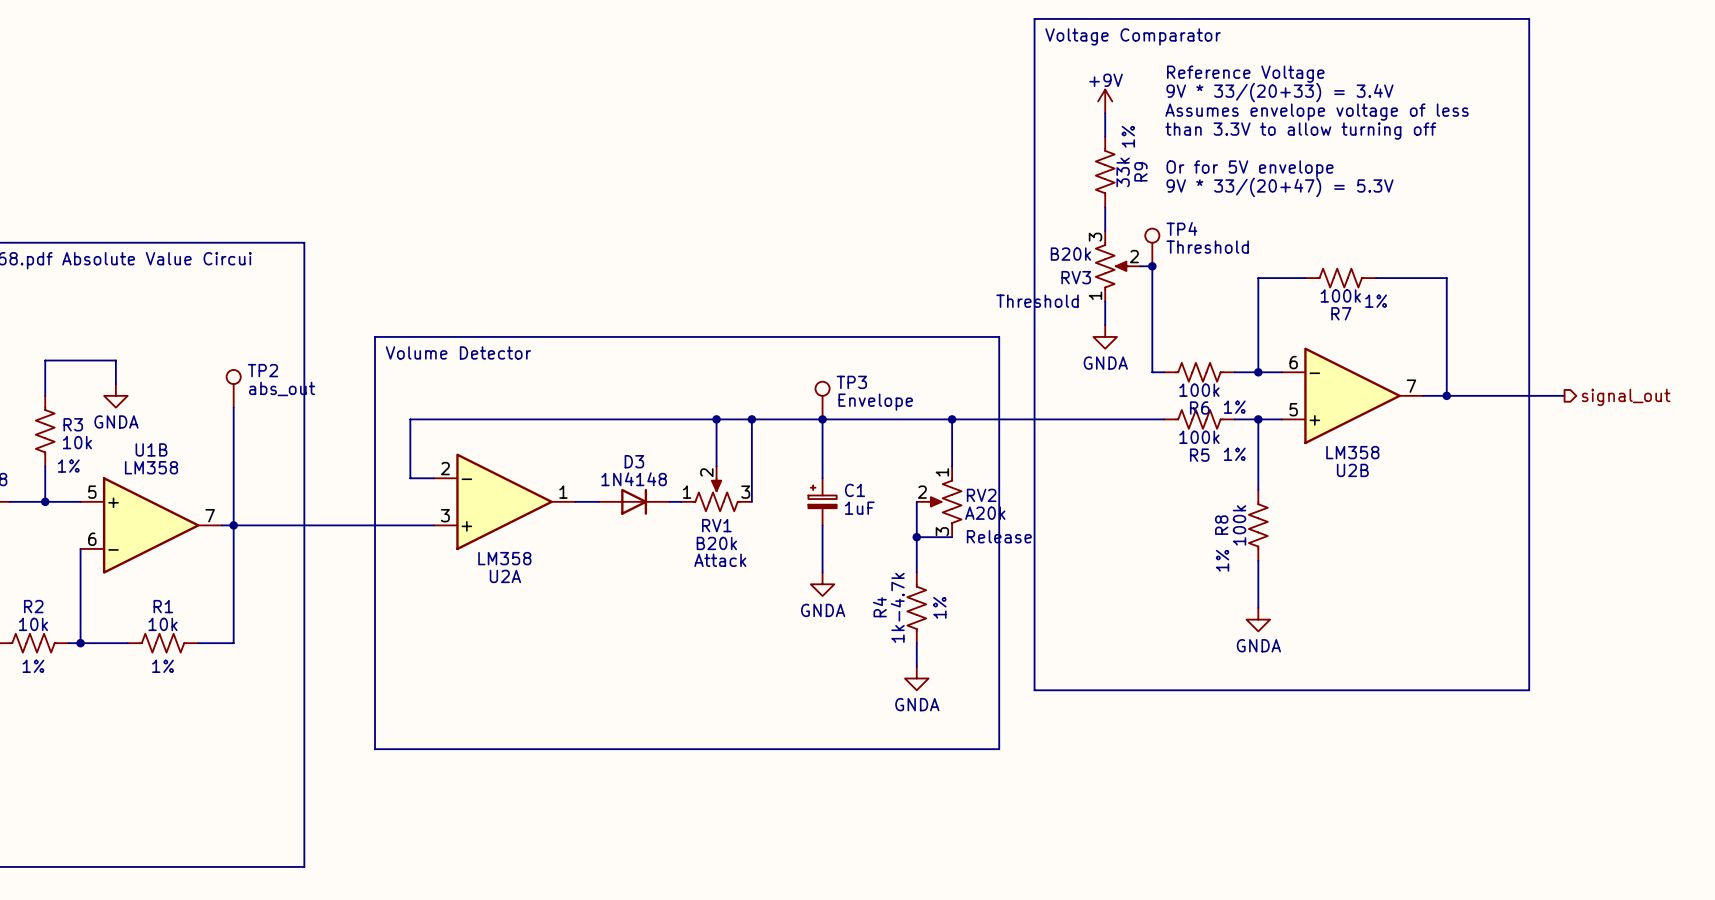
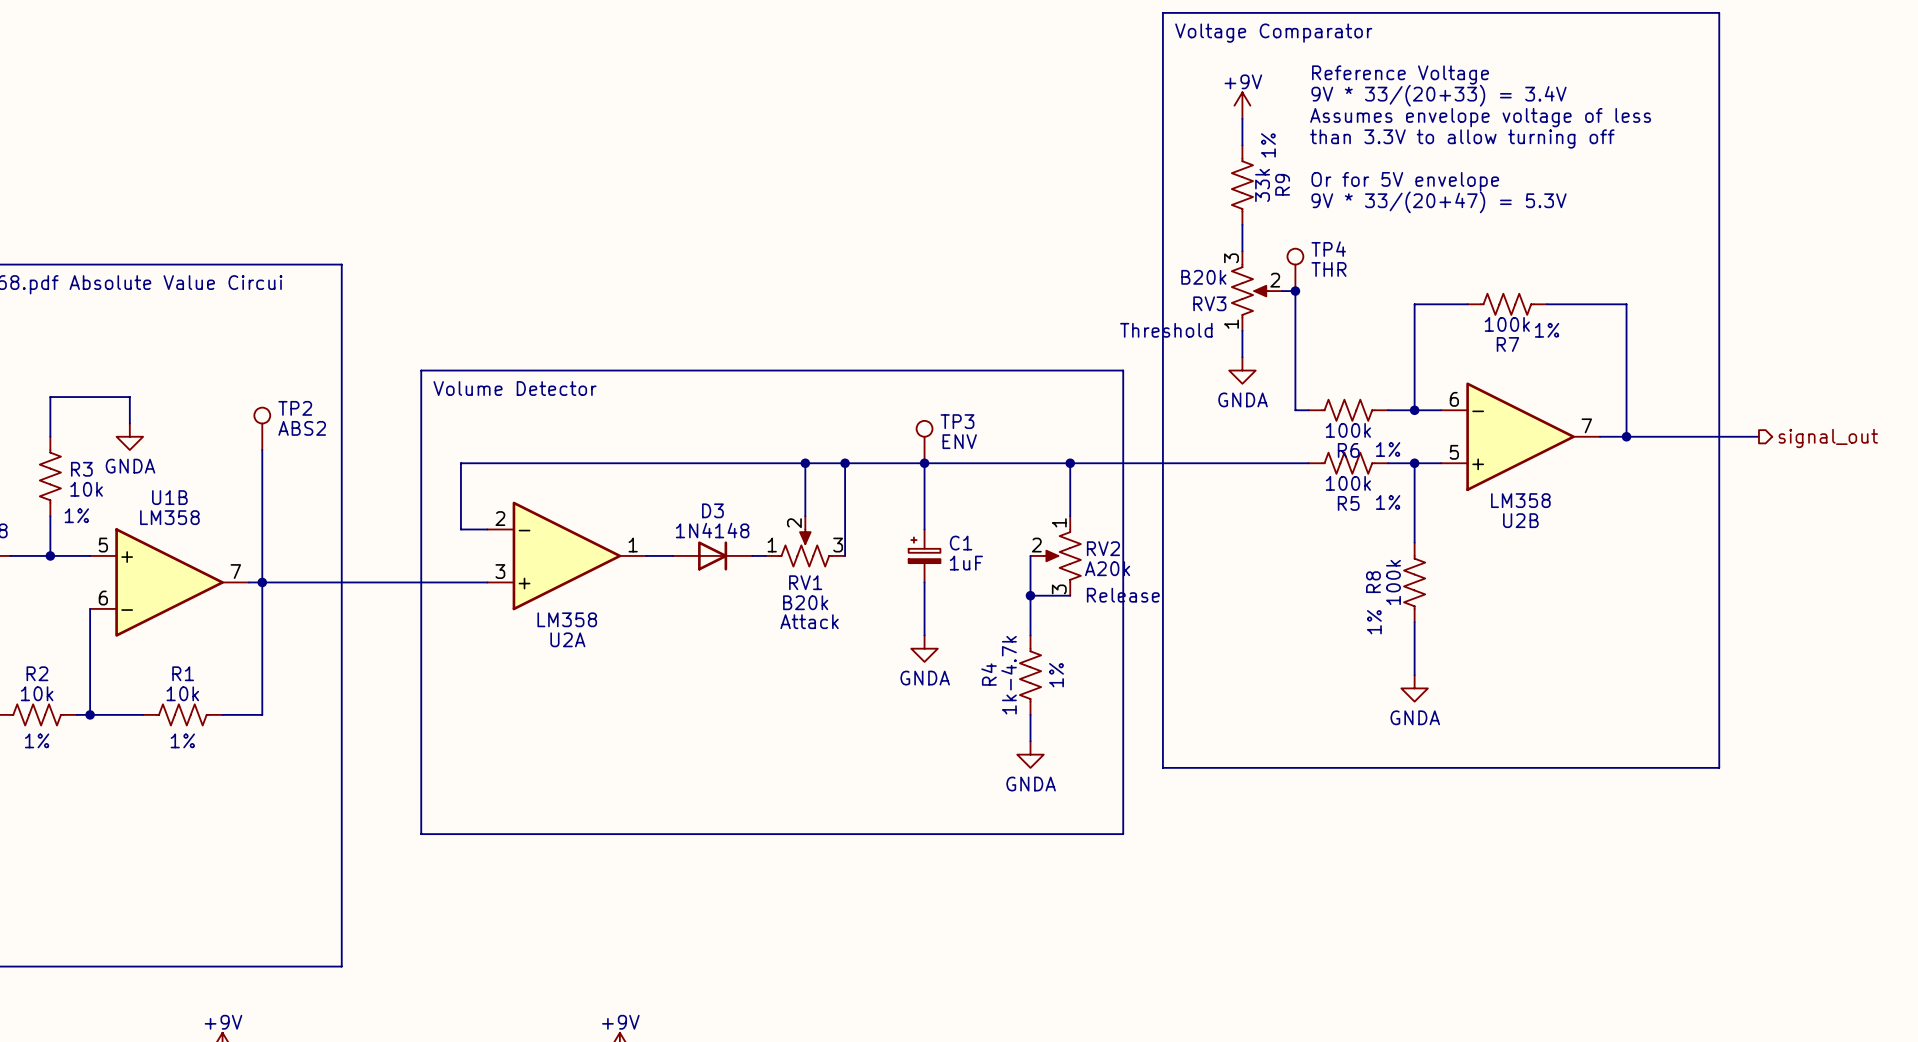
TP4 value: Threshold (1207, 247) -> THR (1329, 269)
TP2 value: abs_out (282, 388) -> ABS2 (302, 428)
TP3 value: Envelope (875, 402) -> ENV (959, 441)

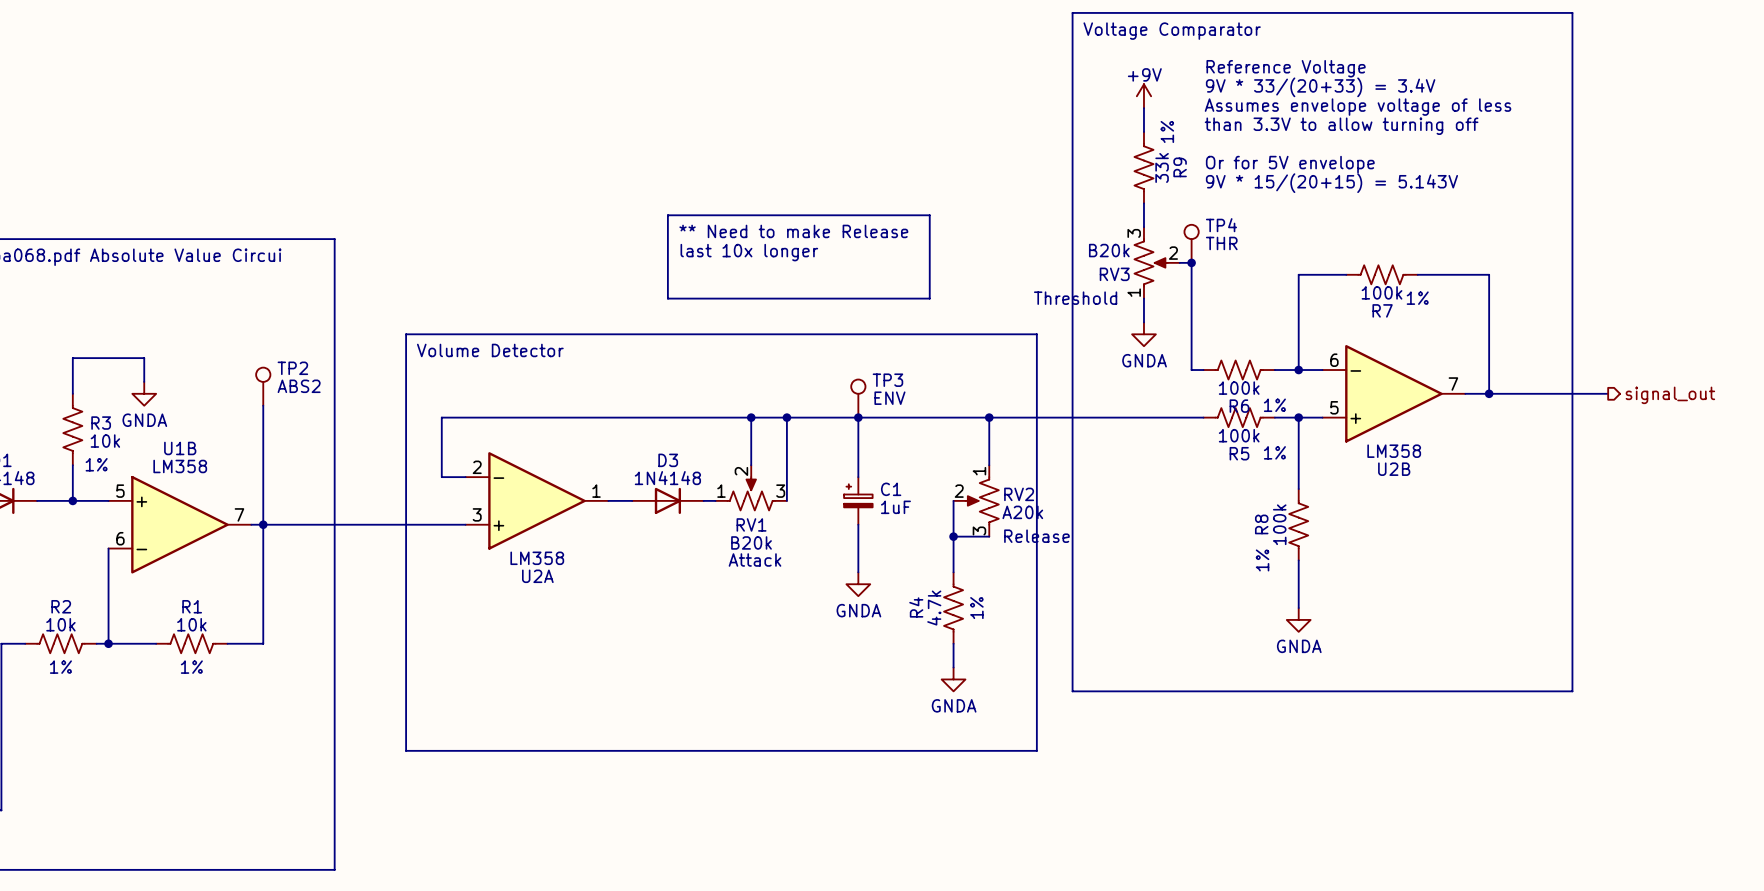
text: 9V * 33/(20+47) = 5.3V (1438, 202) -> 9V * 15/(20+15) = 5.143V (1331, 183)
line: none -> (667, 215) (929, 215) (929, 298) (667, 298) (667, 215)
text: none -> ** Need to make Release (793, 231)
text: none -> last 10x longer (749, 252)
R4 value: 1k-4.7k (1009, 675) -> 4.7k (934, 608)

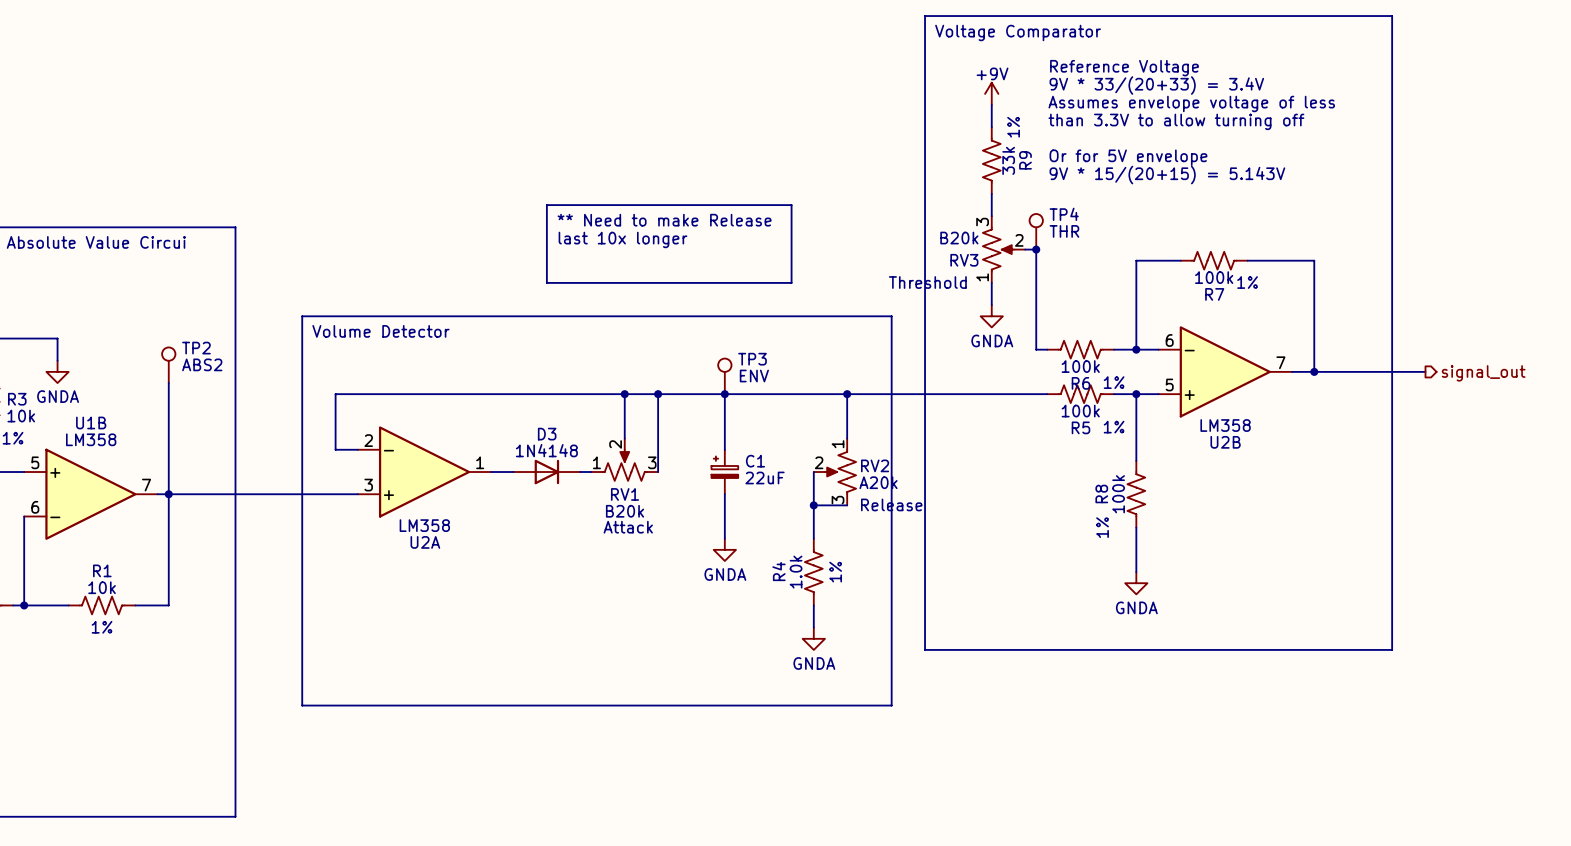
C1 value: 1uF (895, 507) -> 22uF (765, 477)
R4 value: 4.7k (934, 608) -> 1.0k (796, 572)

